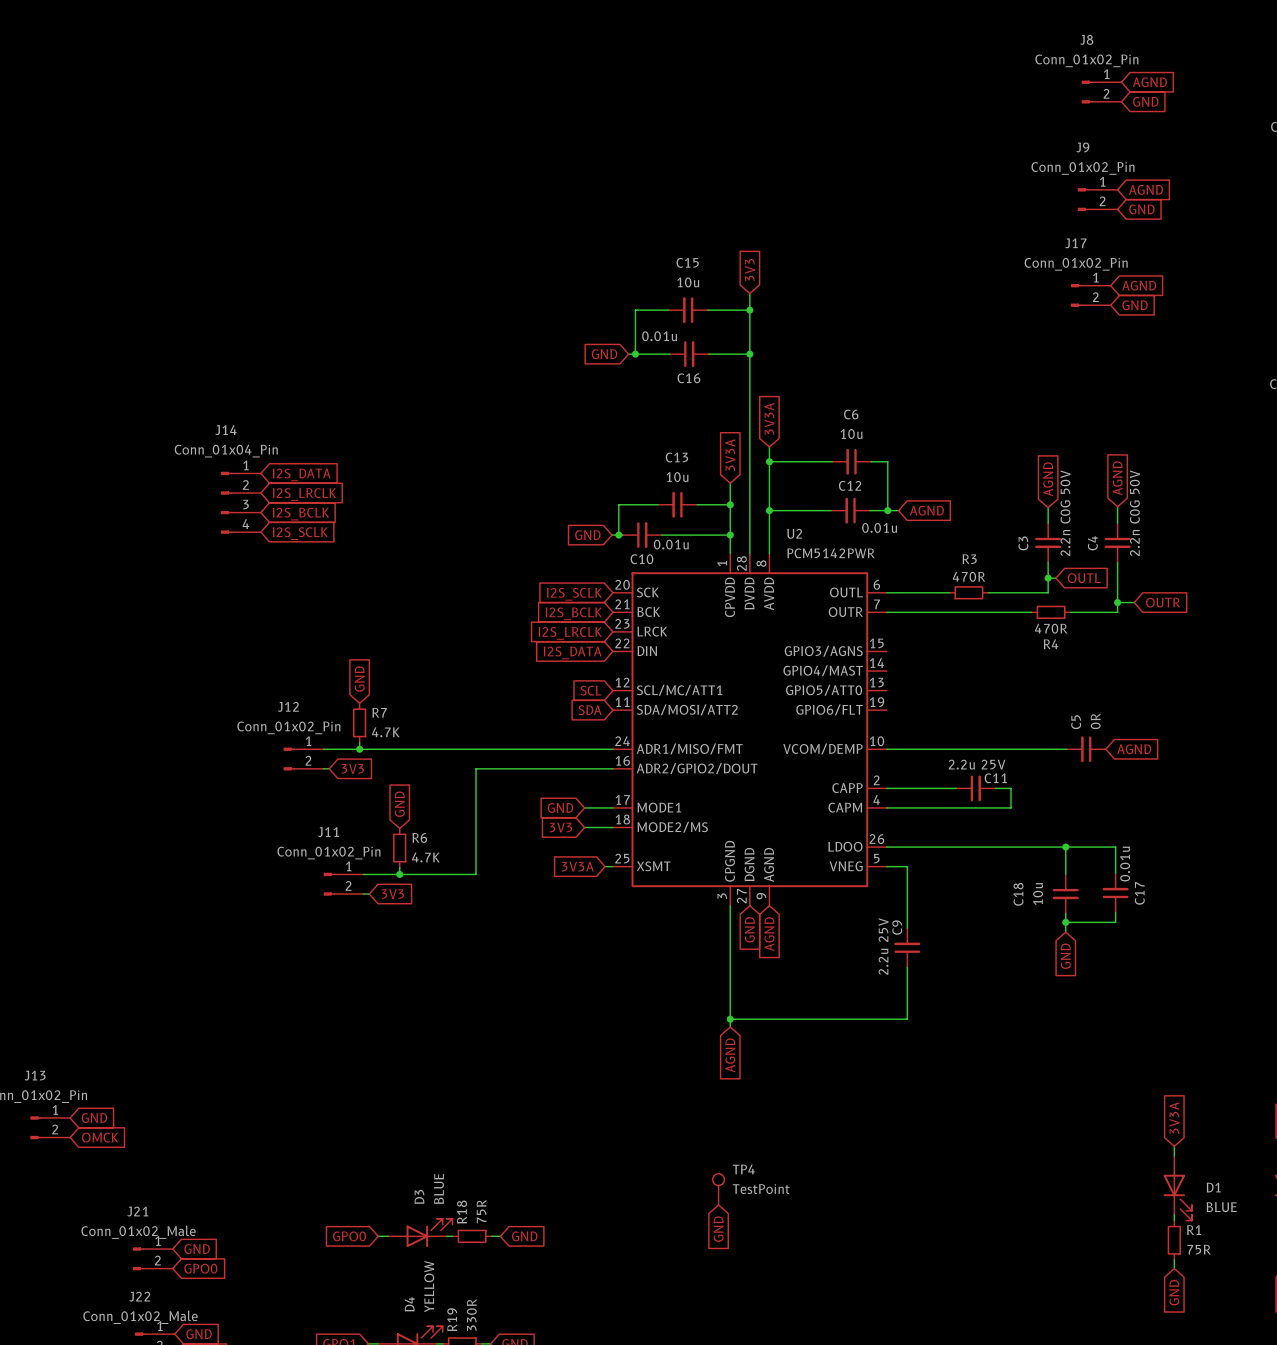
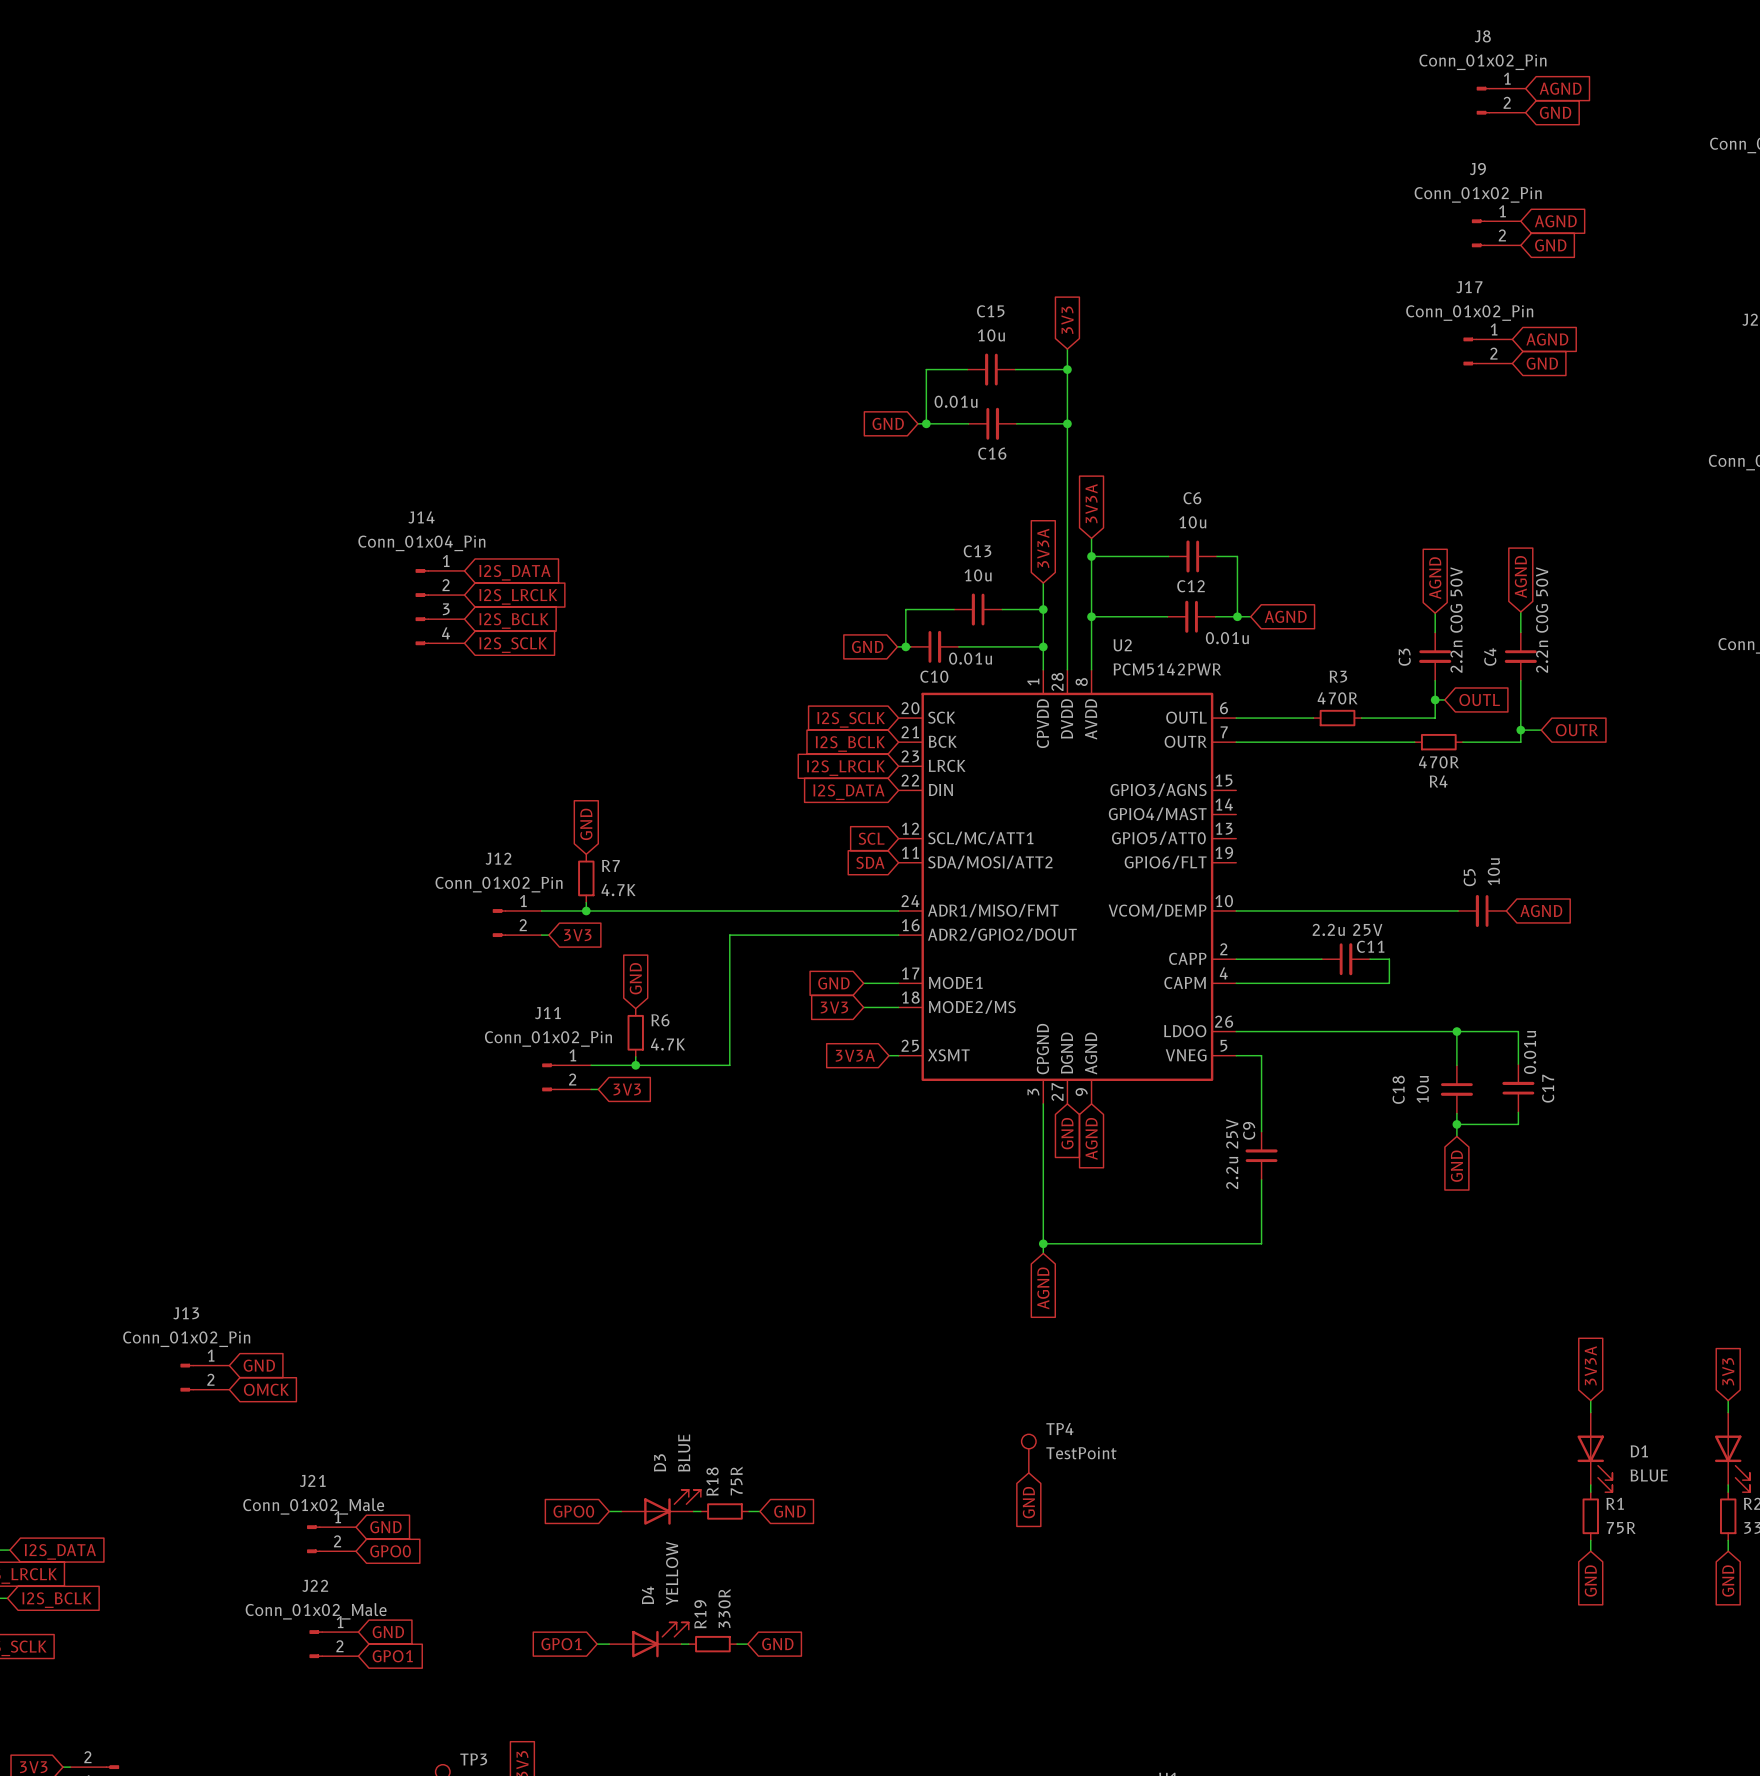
C5 value: 0R (1095, 721) -> 10u (1493, 871)

